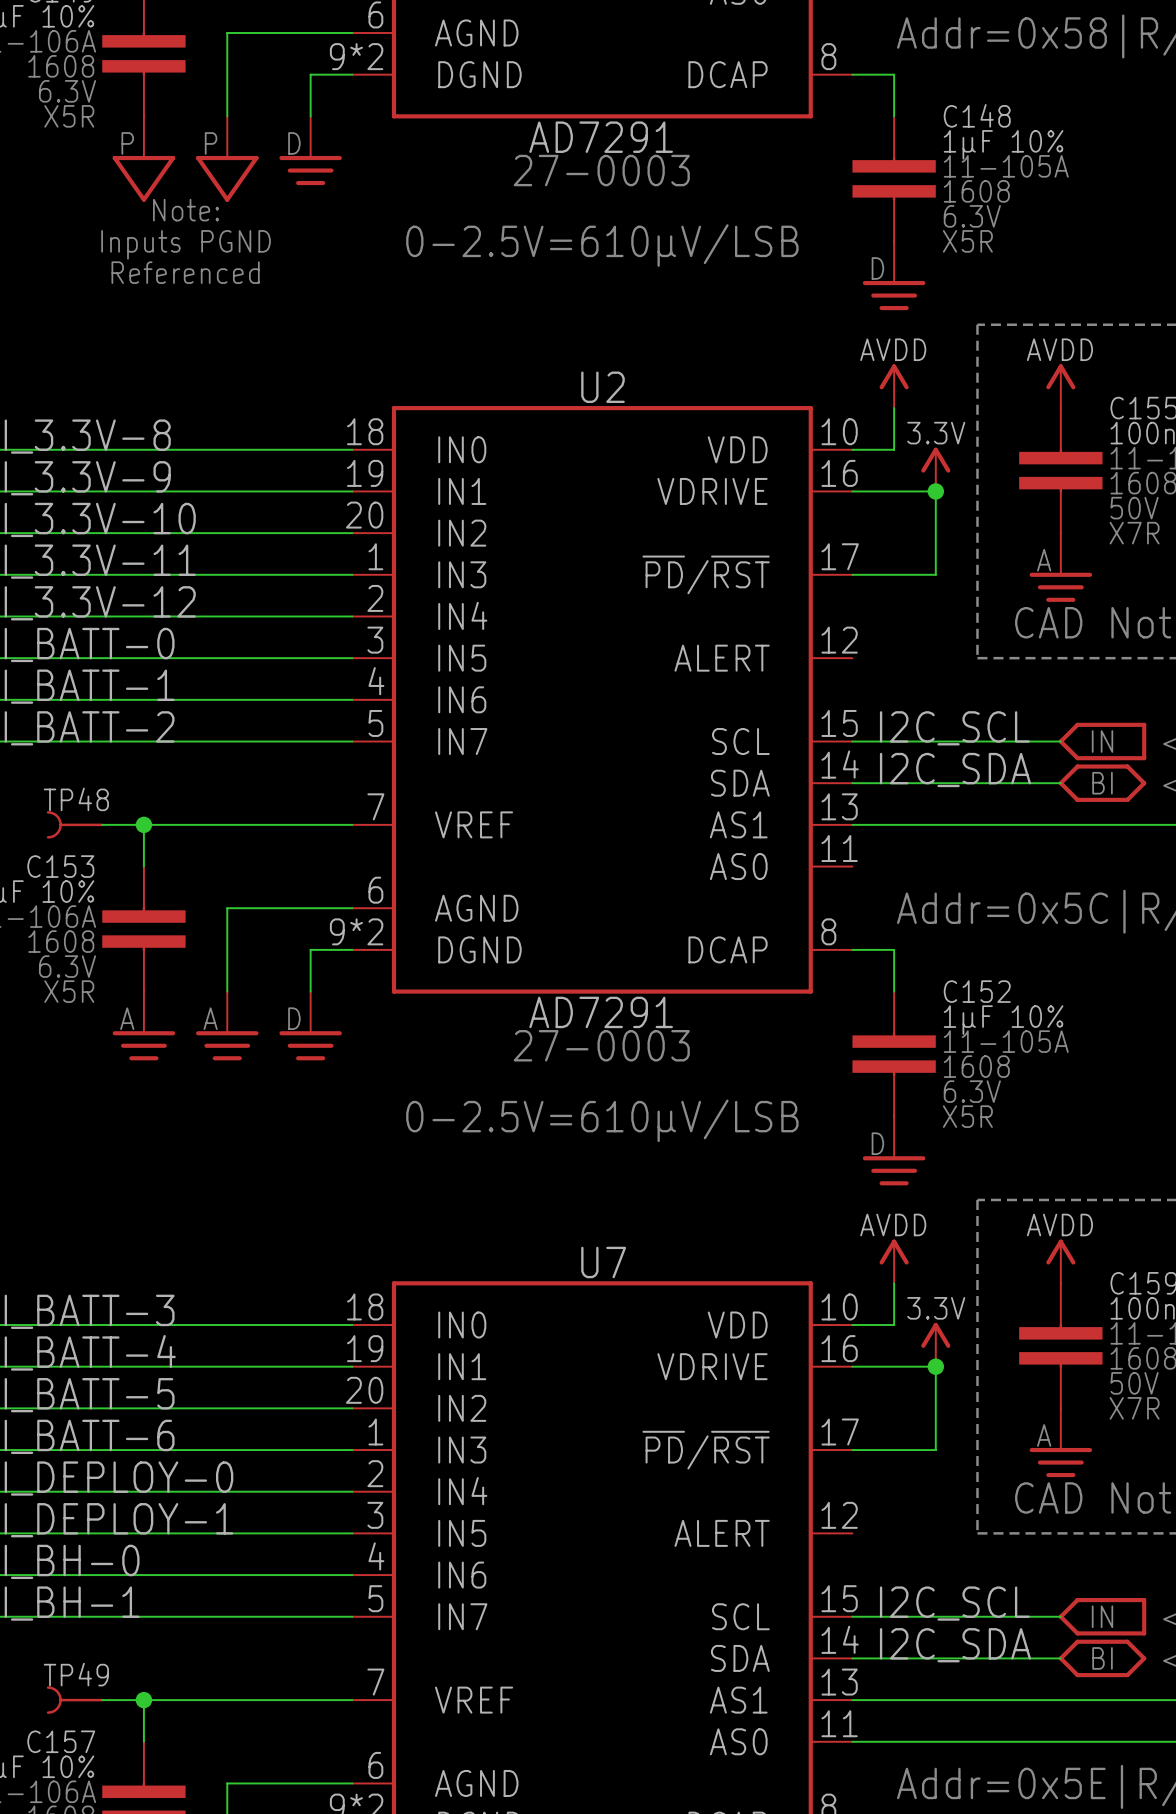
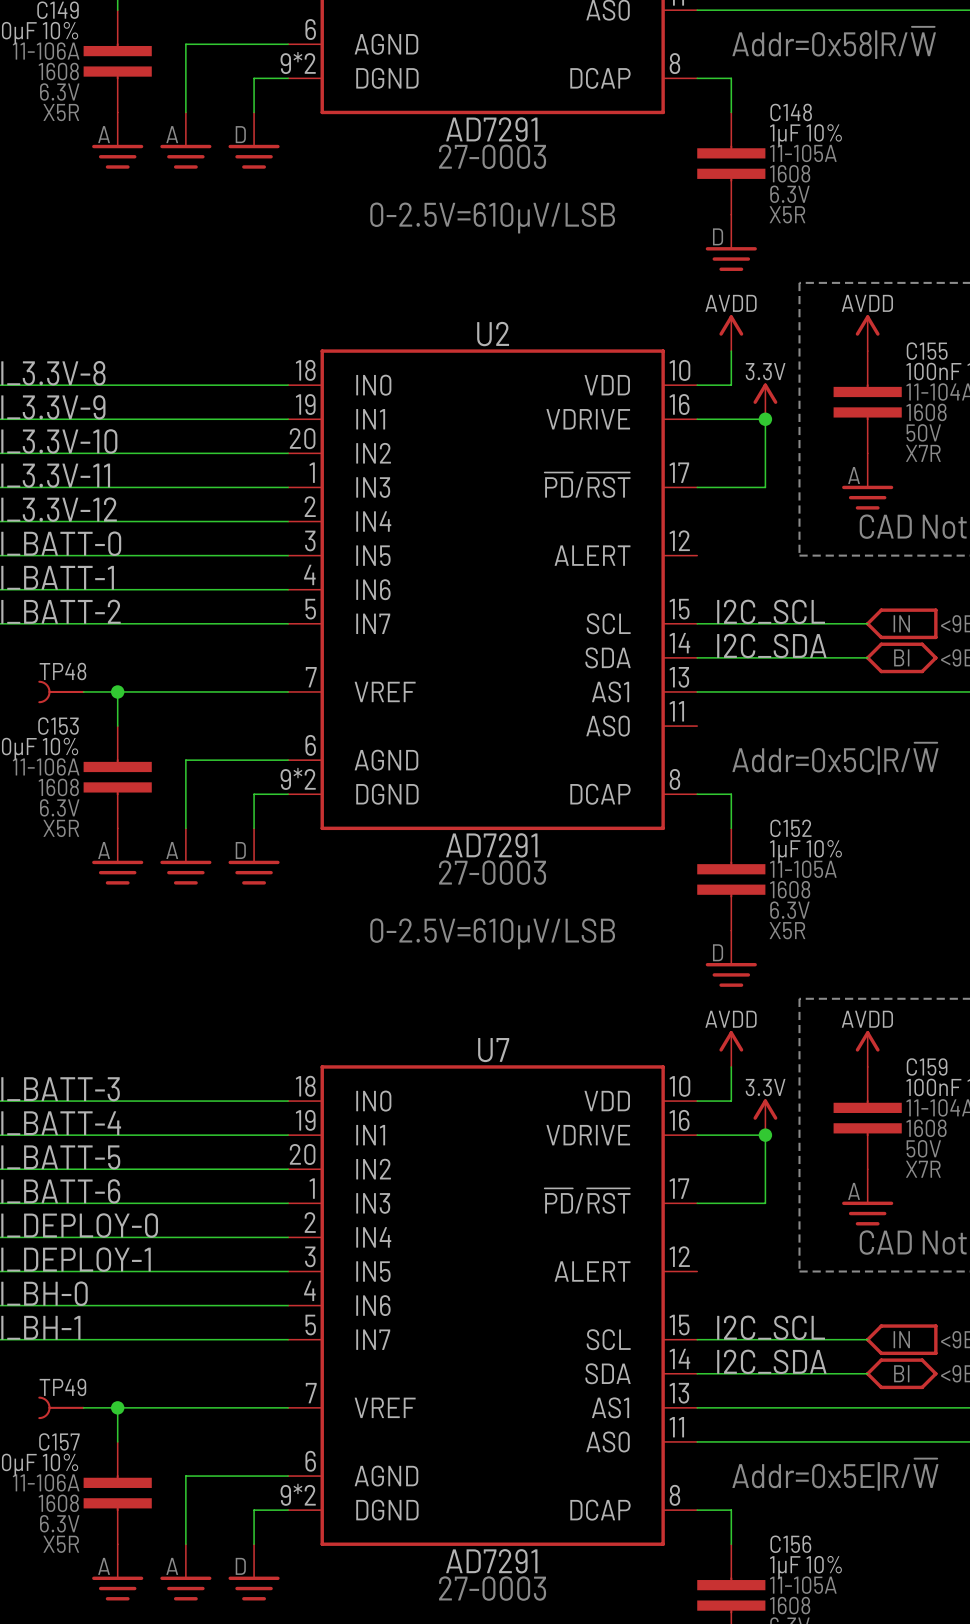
power symbol shape: [112, 116, 176, 202] -> [92, 112, 144, 169]
power symbol shape: [196, 116, 259, 202] -> [160, 112, 212, 169]
text: Note: (186, 210) -> none
text: Inputs PGND (186, 244) -> none
text: Referenced (185, 272) -> none

